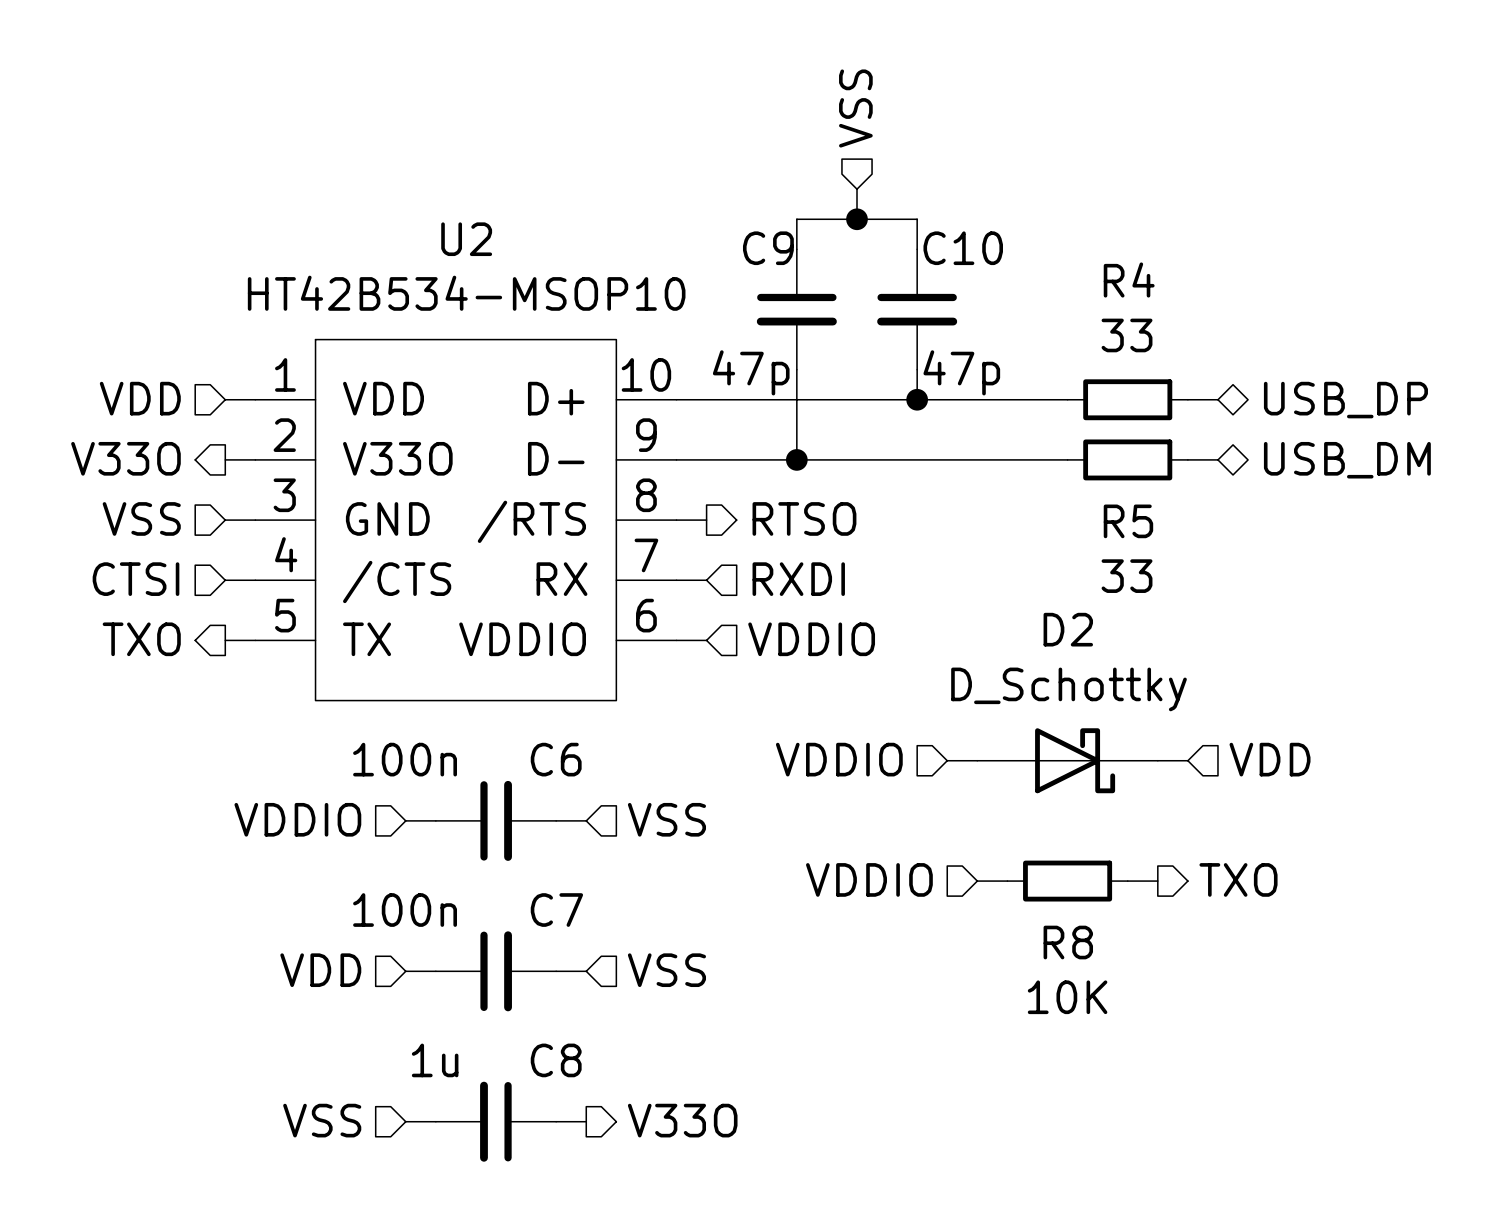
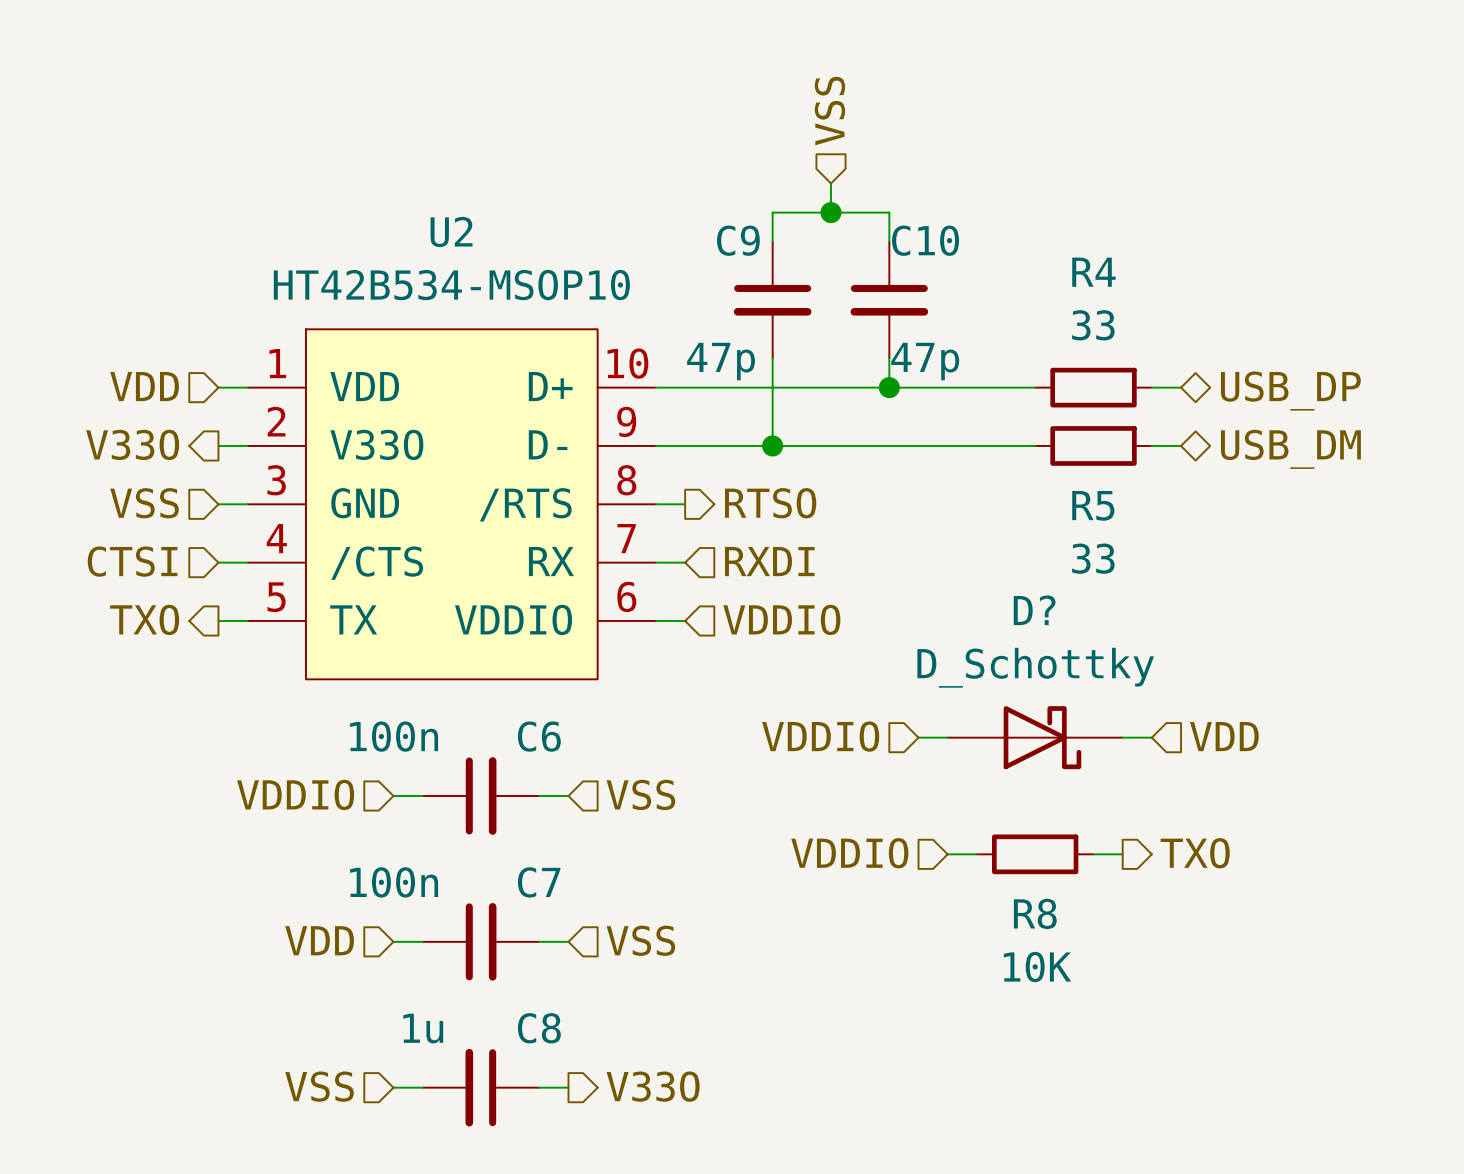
D2 name: D2 (1068, 629) -> D? (1034, 610)

